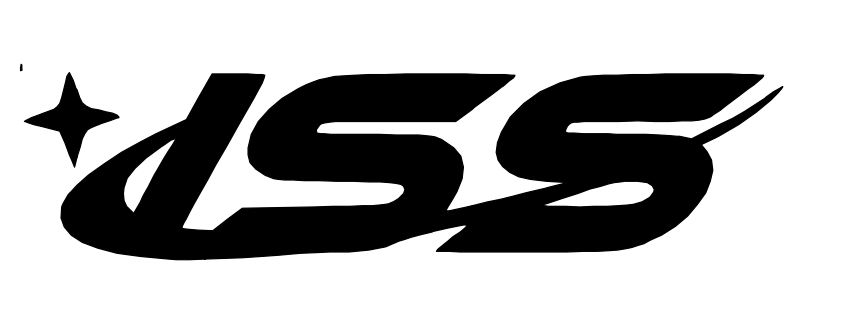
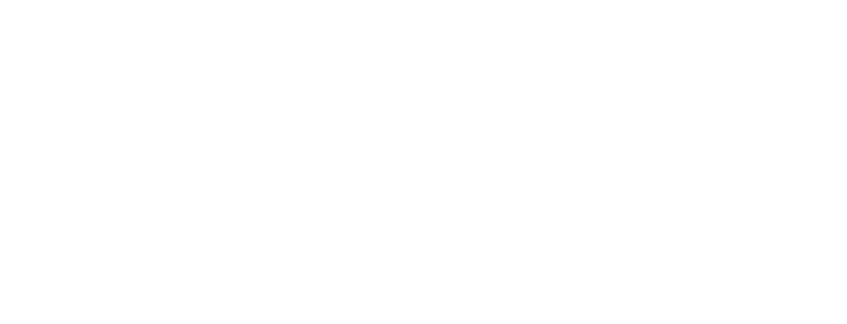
power symbol: (401, 161) -> none

